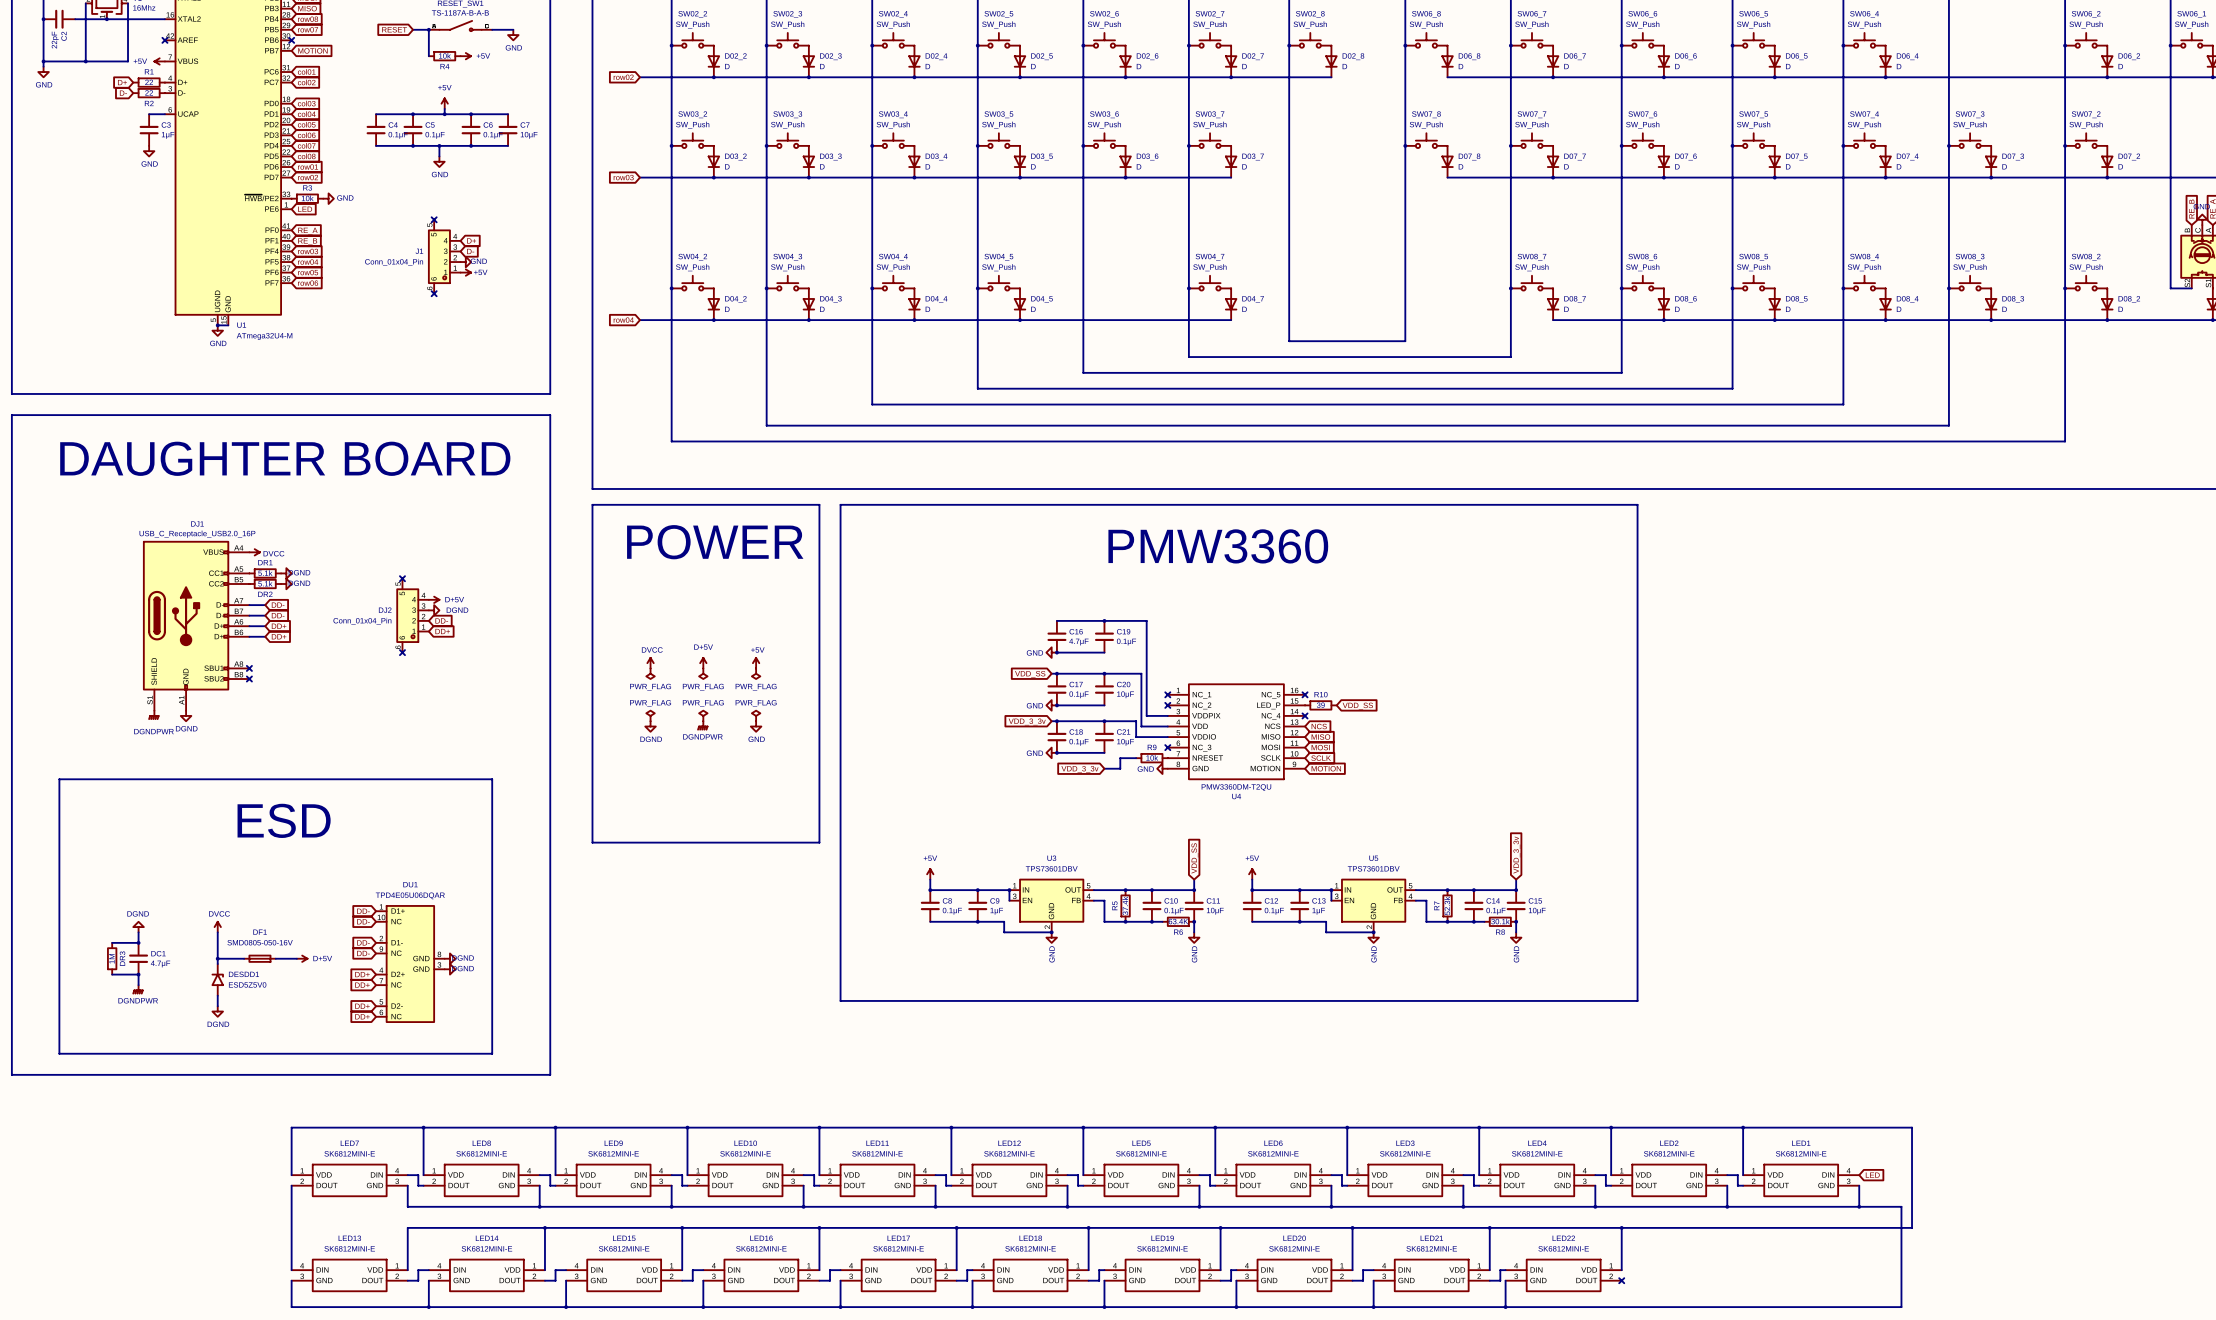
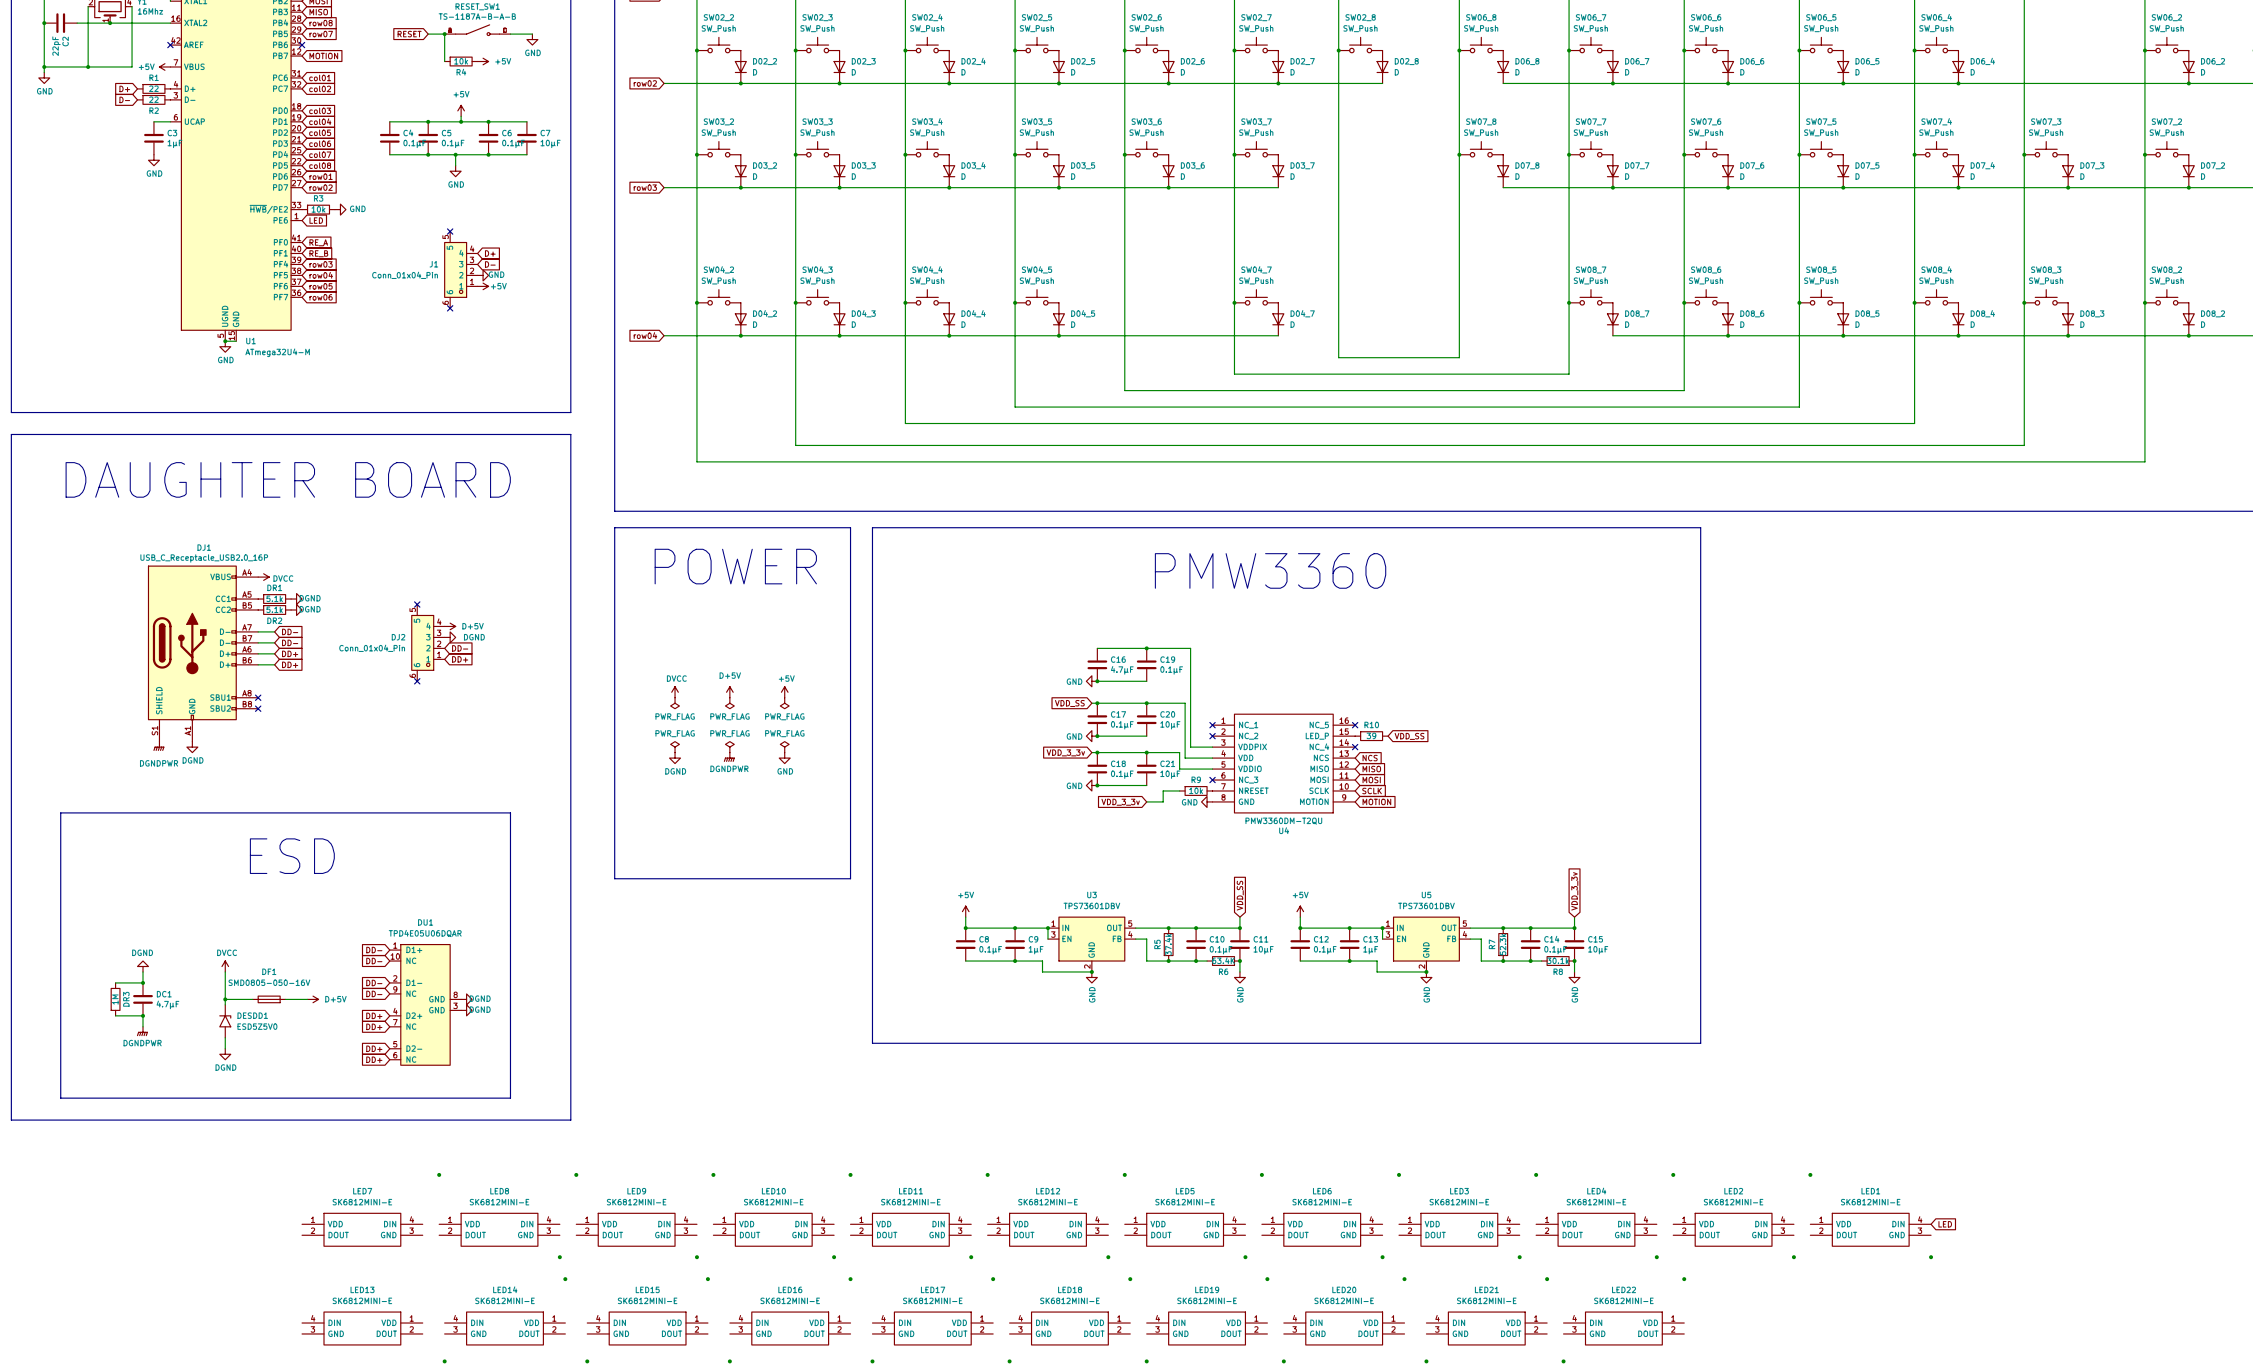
wire: (423, 1127) (423, 1175) -> none
wire: (555, 1127) (555, 1175) -> none
wire: (687, 1127) (687, 1175) -> none
wire: (819, 1127) (819, 1175) -> none
wire: (951, 1127) (951, 1175) -> none
wire: (1083, 1127) (1083, 1175) -> none
wire: (1215, 1127) (1215, 1175) -> none
wire: (1347, 1127) (1347, 1175) -> none
wire: (1479, 1127) (1479, 1175) -> none
wire: (1611, 1127) (1611, 1175) -> none
wire: (1743, 1127) (1743, 1175) -> none
wire: (291, 1175) (291, 1127) (1912, 1127) (1912, 1227) (407, 1227) (407, 1270) -> none
wire: (407, 1175) (418, 1175) (418, 1185) (423, 1185) -> none
wire: (539, 1175) (550, 1175) (550, 1185) (555, 1185) -> none
wire: (671, 1175) (682, 1175) (682, 1185) (687, 1185) -> none
wire: (803, 1175) (814, 1175) (814, 1185) (819, 1185) -> none
wire: (935, 1175) (946, 1175) (946, 1185) (951, 1185) -> none
wire: (1067, 1175) (1078, 1175) (1078, 1185) (1083, 1185) -> none
wire: (1199, 1175) (1210, 1175) (1210, 1185) (1215, 1185) -> none
wire: (1331, 1175) (1341, 1175) (1341, 1185) (1347, 1185) -> none
wire: (1463, 1175) (1473, 1175) (1473, 1185) (1479, 1185) -> none
wire: (1595, 1175) (1605, 1175) (1605, 1185) (1611, 1185) -> none
wire: (1727, 1175) (1737, 1175) (1737, 1185) (1743, 1185) -> none
wire: (291, 1185) (291, 1270) -> none
wire: (407, 1185) (407, 1206) (1901, 1206) (1901, 1307) (291, 1307) (291, 1280) -> none
wire: (539, 1185) (539, 1206) -> none
wire: (671, 1185) (671, 1206) -> none
wire: (803, 1185) (803, 1206) -> none
wire: (935, 1185) (935, 1206) -> none
wire: (1067, 1185) (1067, 1206) -> none
wire: (1199, 1185) (1199, 1206) -> none
wire: (1331, 1185) (1331, 1206) -> none
wire: (1463, 1185) (1463, 1206) -> none
wire: (1595, 1185) (1595, 1206) -> none
wire: (1727, 1185) (1727, 1206) -> none
wire: (1859, 1185) (1859, 1206) -> none
wire: (544, 1227) (544, 1270) -> none
wire: (682, 1227) (682, 1270) -> none
wire: (819, 1227) (819, 1270) -> none
wire: (956, 1227) (956, 1270) -> none
wire: (1088, 1227) (1088, 1270) -> none
wire: (1220, 1227) (1220, 1270) -> none
wire: (1352, 1227) (1352, 1270) -> none
wire: (1489, 1227) (1489, 1270) -> none
wire: (1621, 1227) (1621, 1270) -> none
wire: (428, 1270) (418, 1270) (418, 1280) (407, 1280) -> none
wire: (566, 1270) (555, 1270) (555, 1280) (544, 1280) -> none
wire: (703, 1270) (692, 1270) (692, 1280) (682, 1280) -> none
wire: (840, 1270) (830, 1270) (830, 1280) (819, 1280) -> none
wire: (972, 1270) (967, 1270) (967, 1280) (956, 1280) -> none
wire: (1104, 1270) (1099, 1270) (1099, 1280) (1088, 1280) -> none
wire: (1236, 1270) (1231, 1270) (1231, 1280) (1220, 1280) -> none
wire: (1373, 1270) (1363, 1270) (1363, 1280) (1352, 1280) -> none
wire: (1505, 1270) (1500, 1270) (1500, 1280) (1489, 1280) -> none
wire: (428, 1280) (428, 1307) -> none
wire: (566, 1280) (566, 1307) -> none
wire: (703, 1280) (703, 1307) -> none
wire: (840, 1280) (840, 1307) -> none
wire: (972, 1280) (972, 1307) -> none
wire: (1104, 1280) (1104, 1307) -> none
wire: (1236, 1280) (1236, 1307) -> none
wire: (1373, 1280) (1373, 1307) -> none
wire: (1505, 1280) (1505, 1307) -> none
no-connect mark: (1621, 1280) -> none

